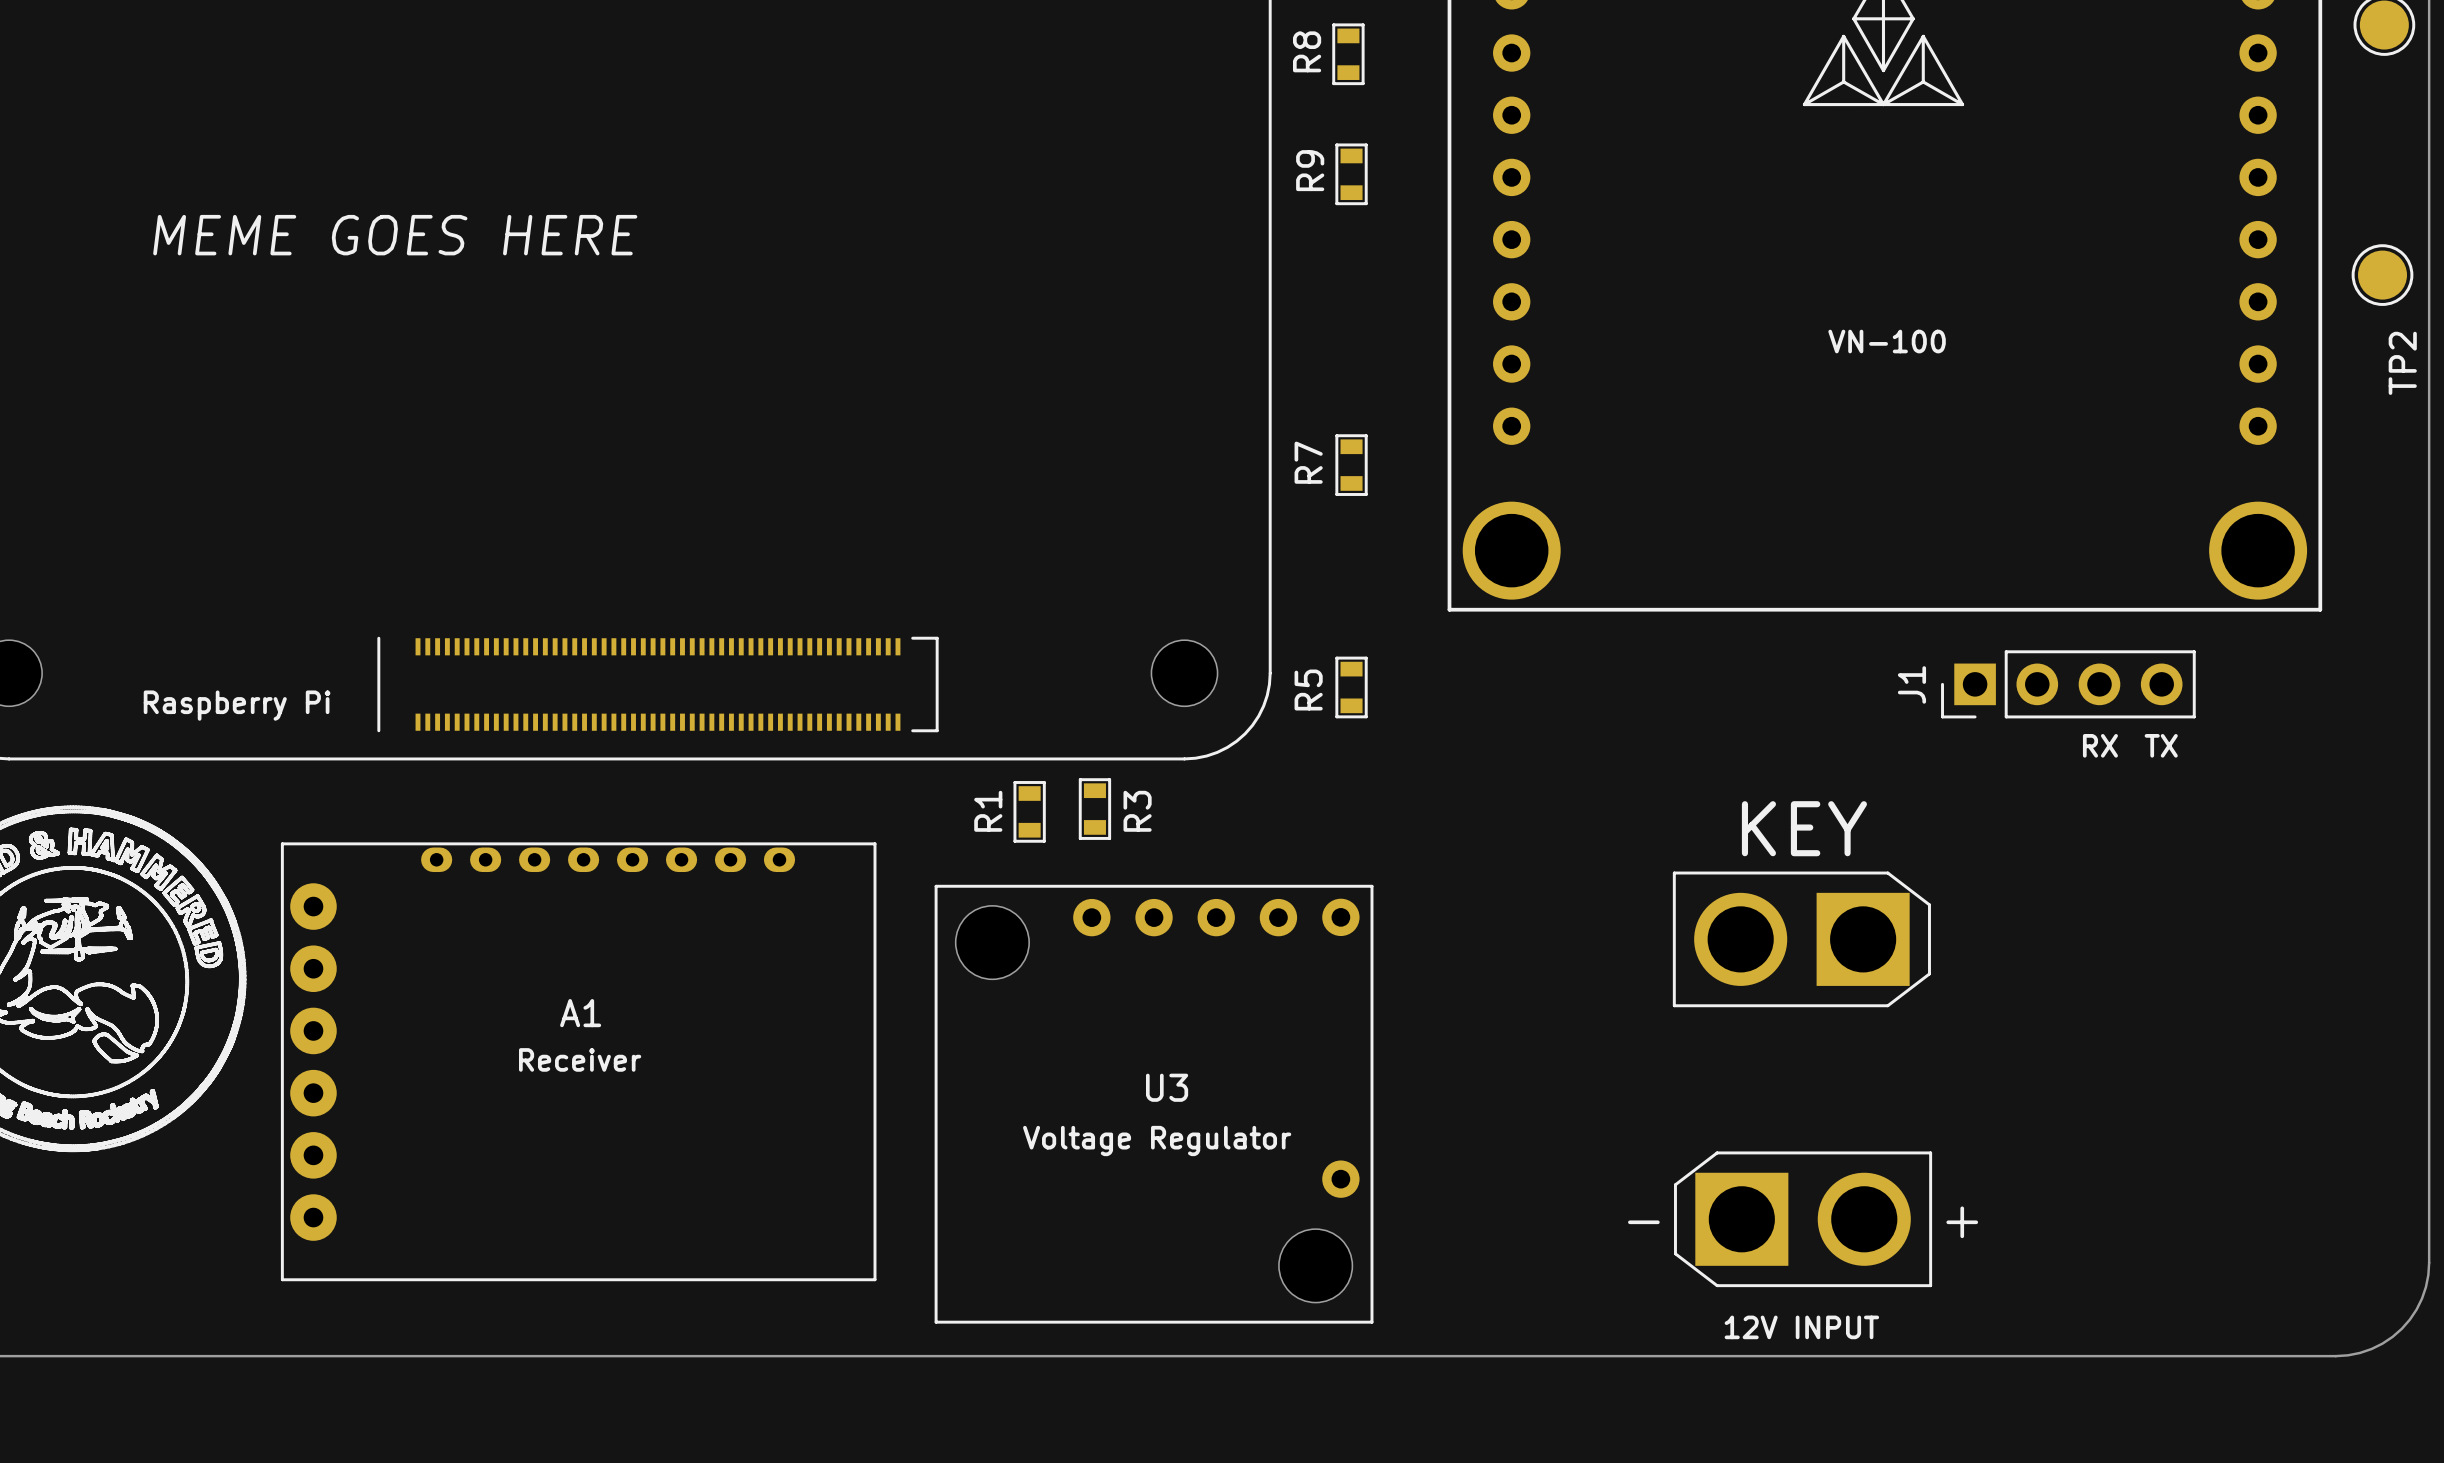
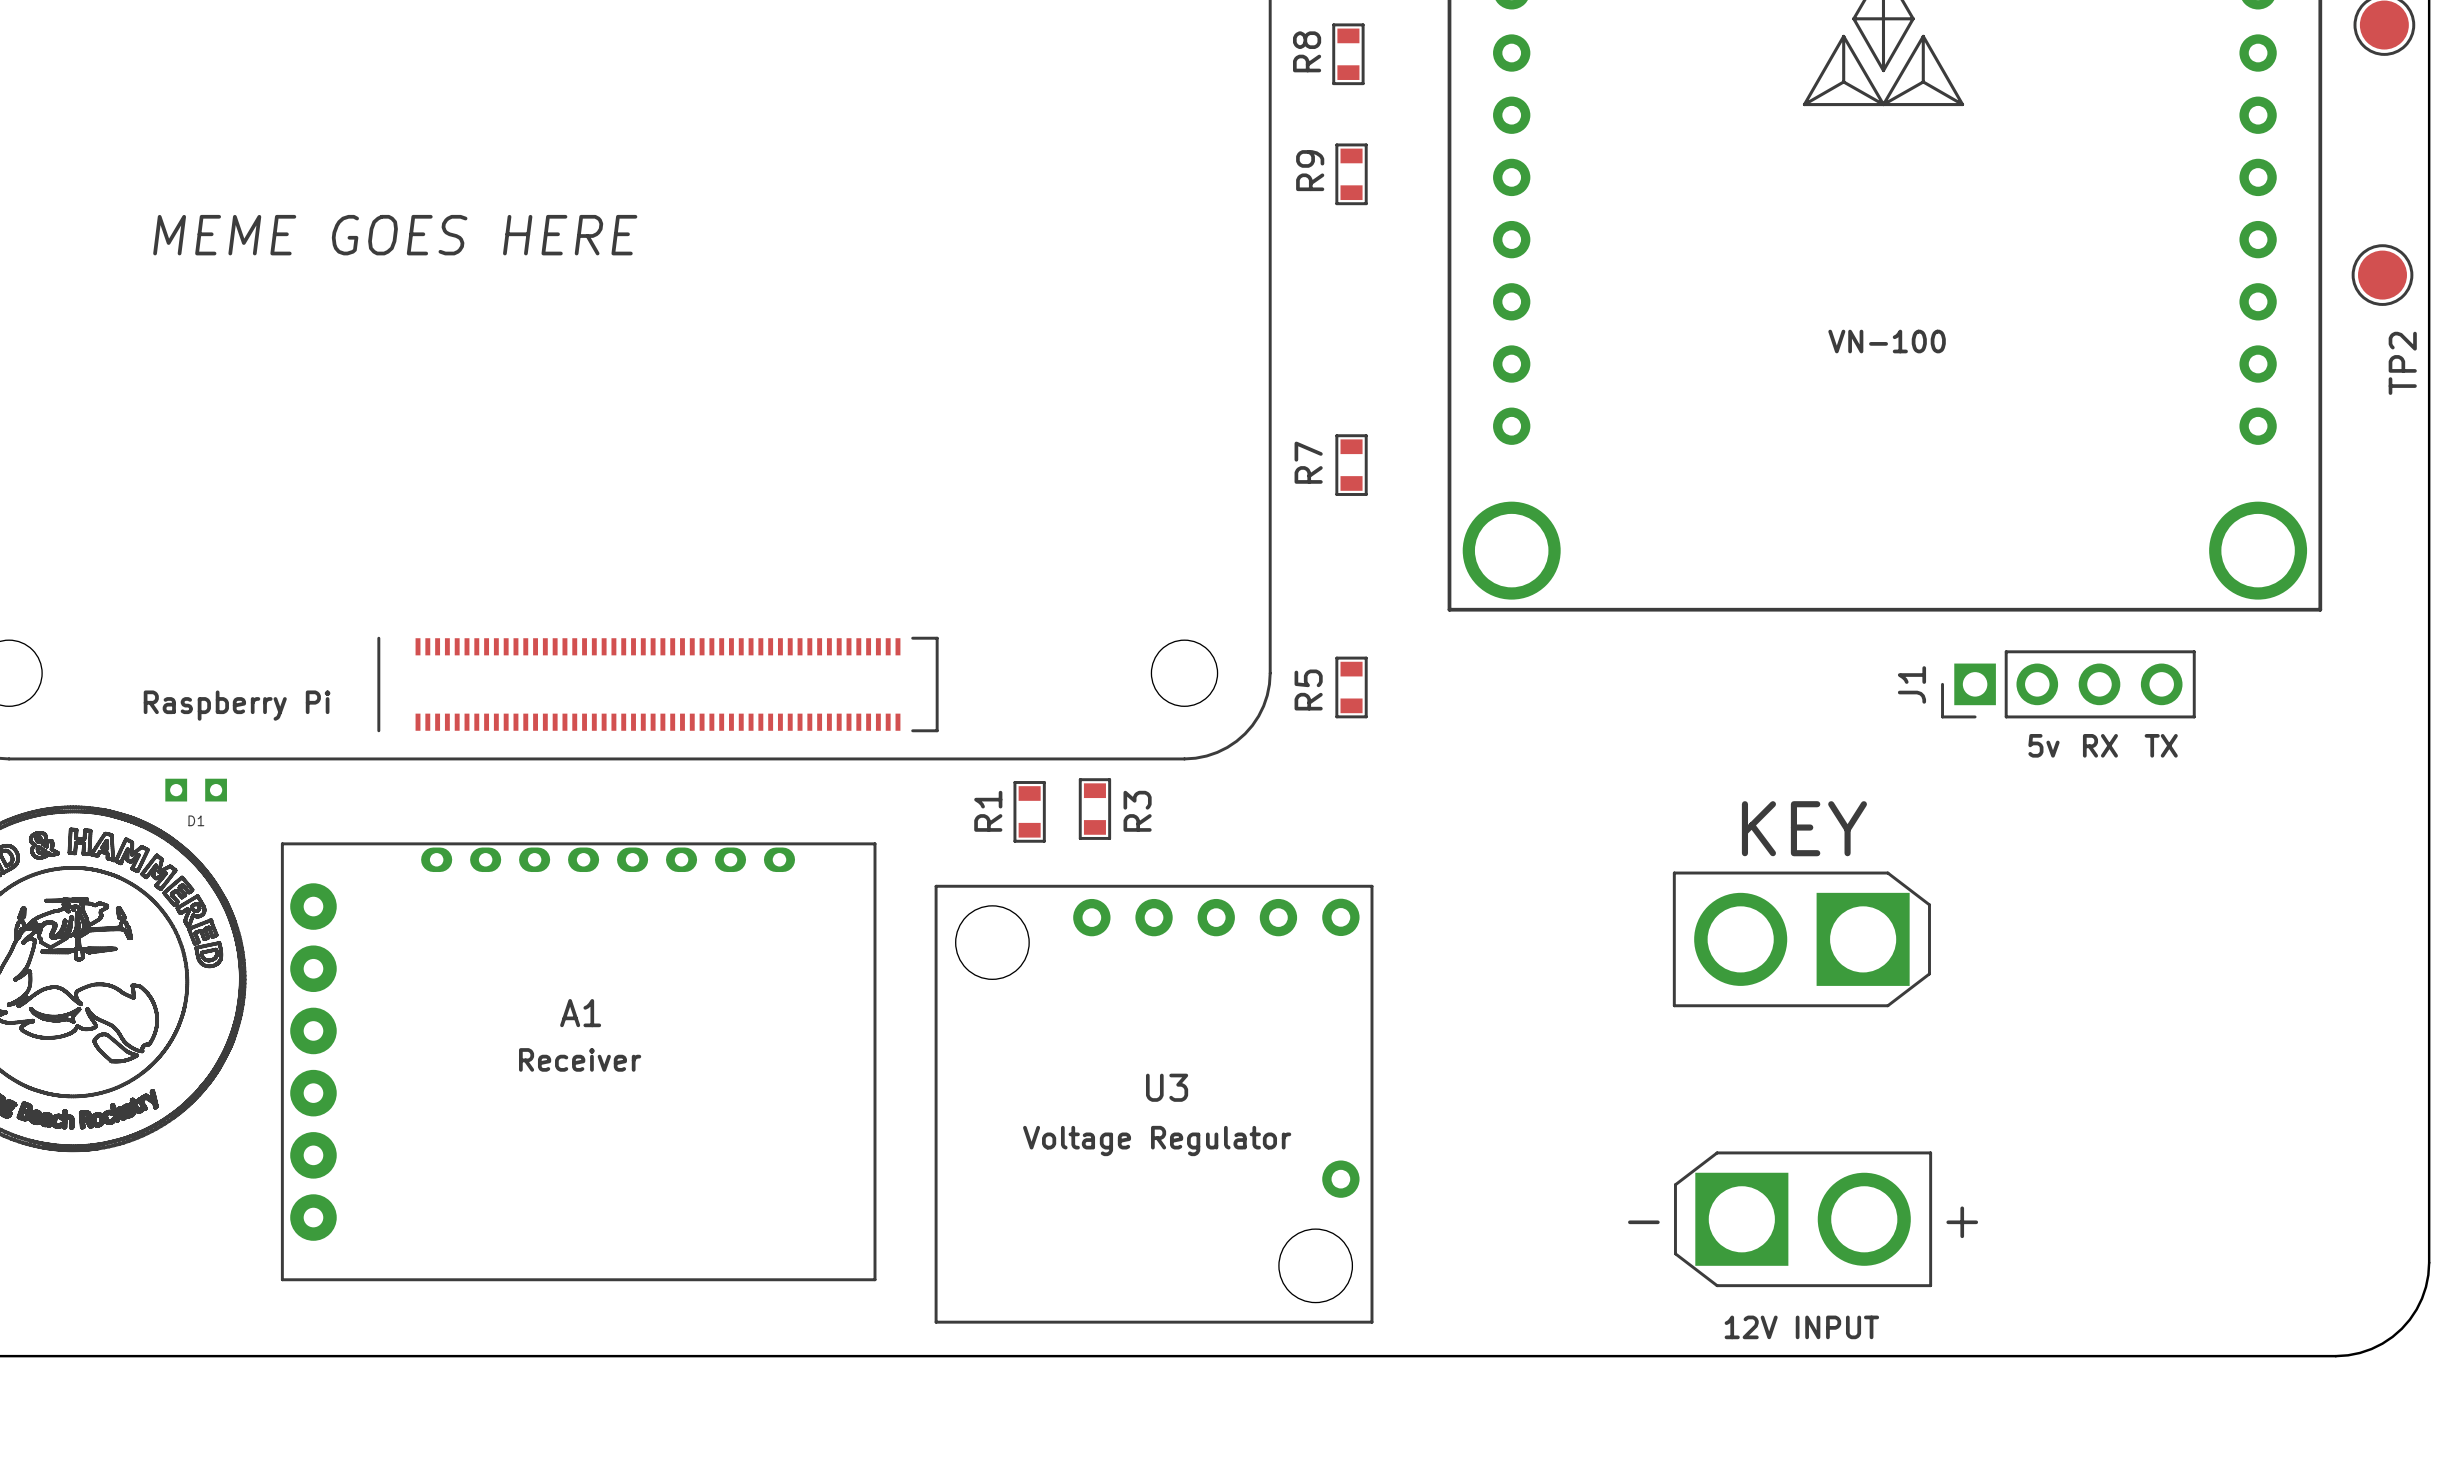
text: none -> 5v (2043, 745)
D1: none -> (196, 790)

